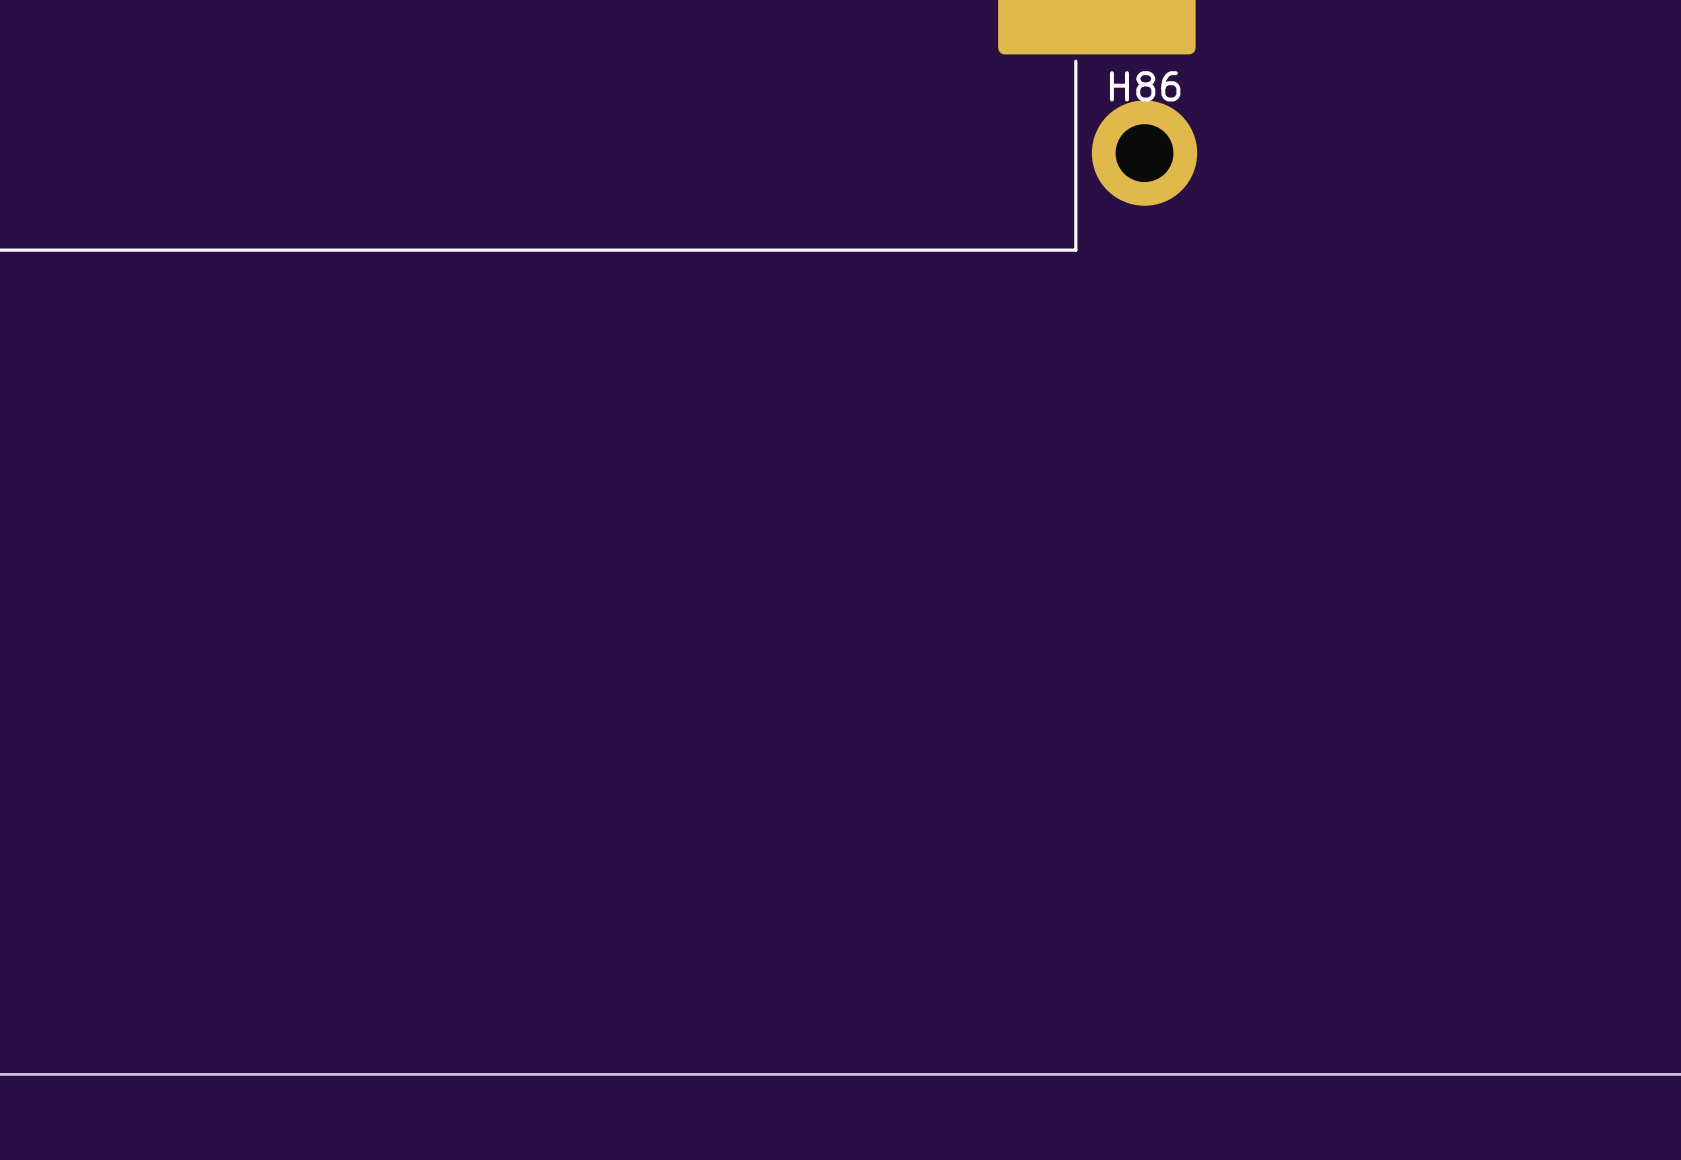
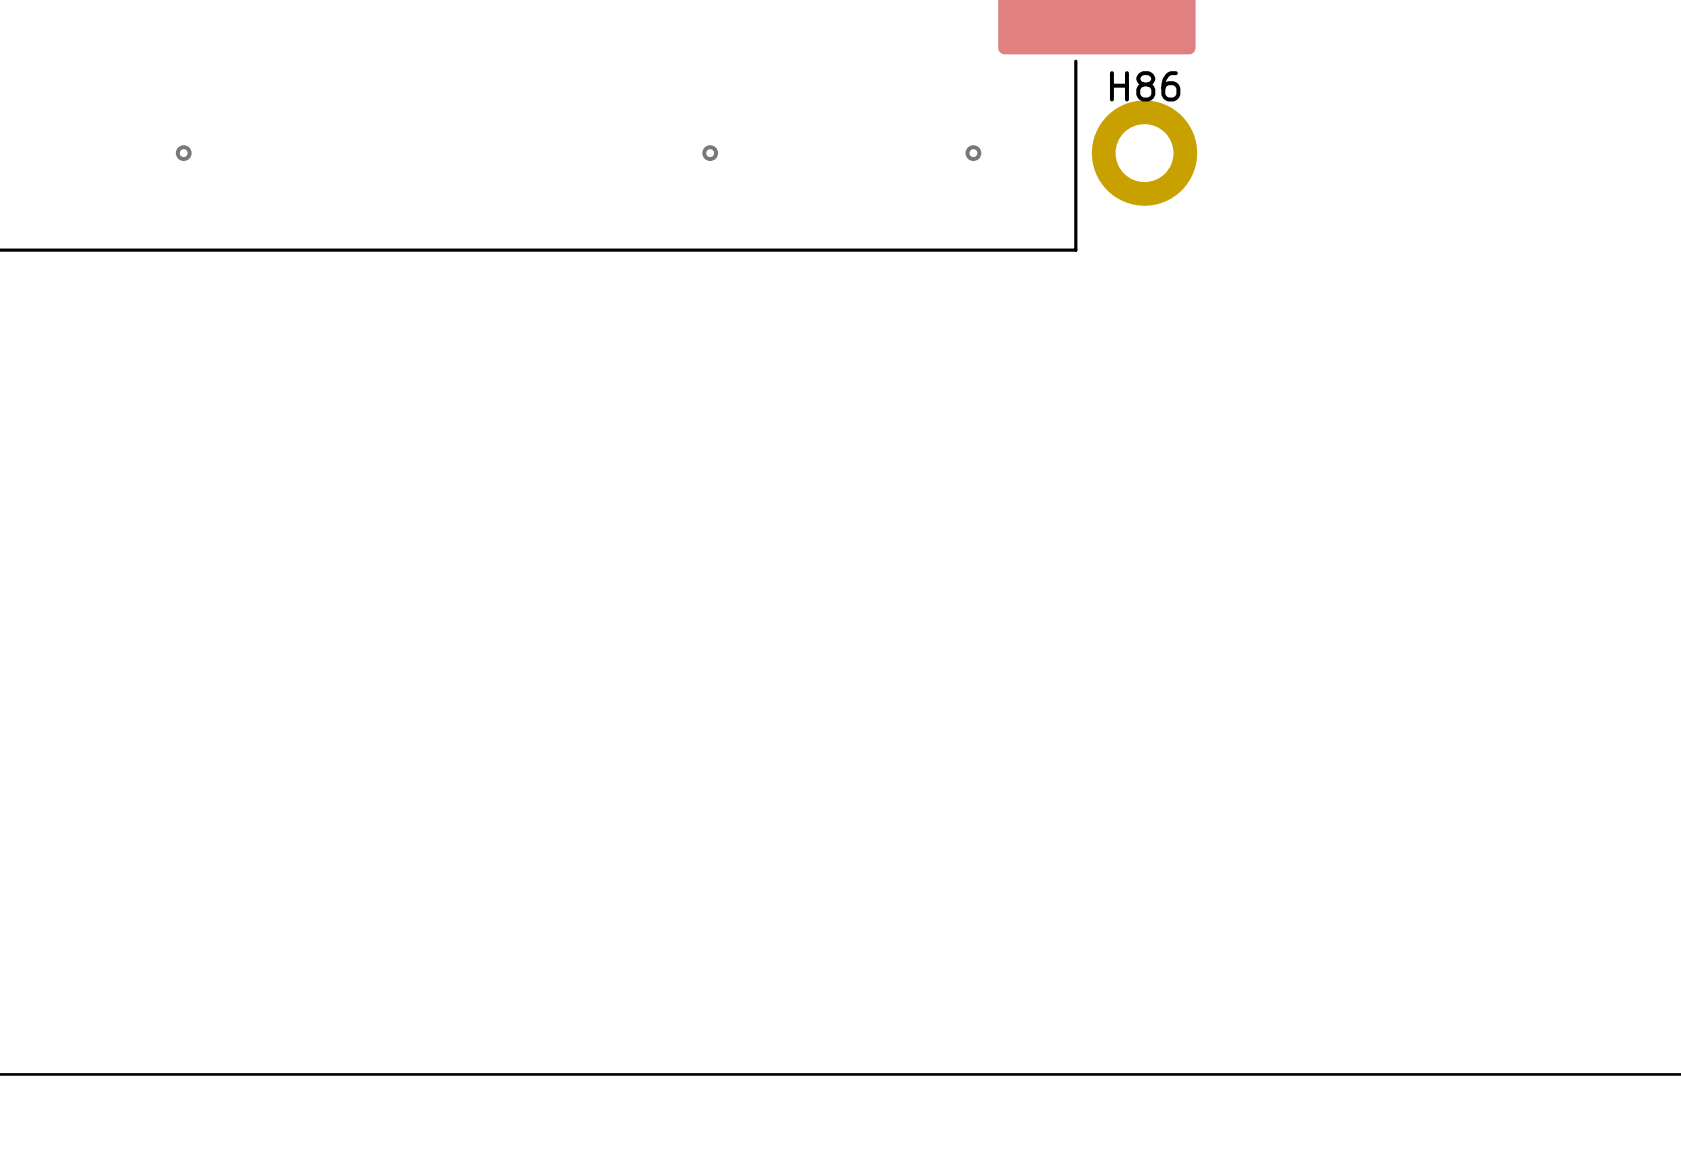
via: none -> (183, 153)
via: none -> (710, 153)
via: none -> (973, 153)

